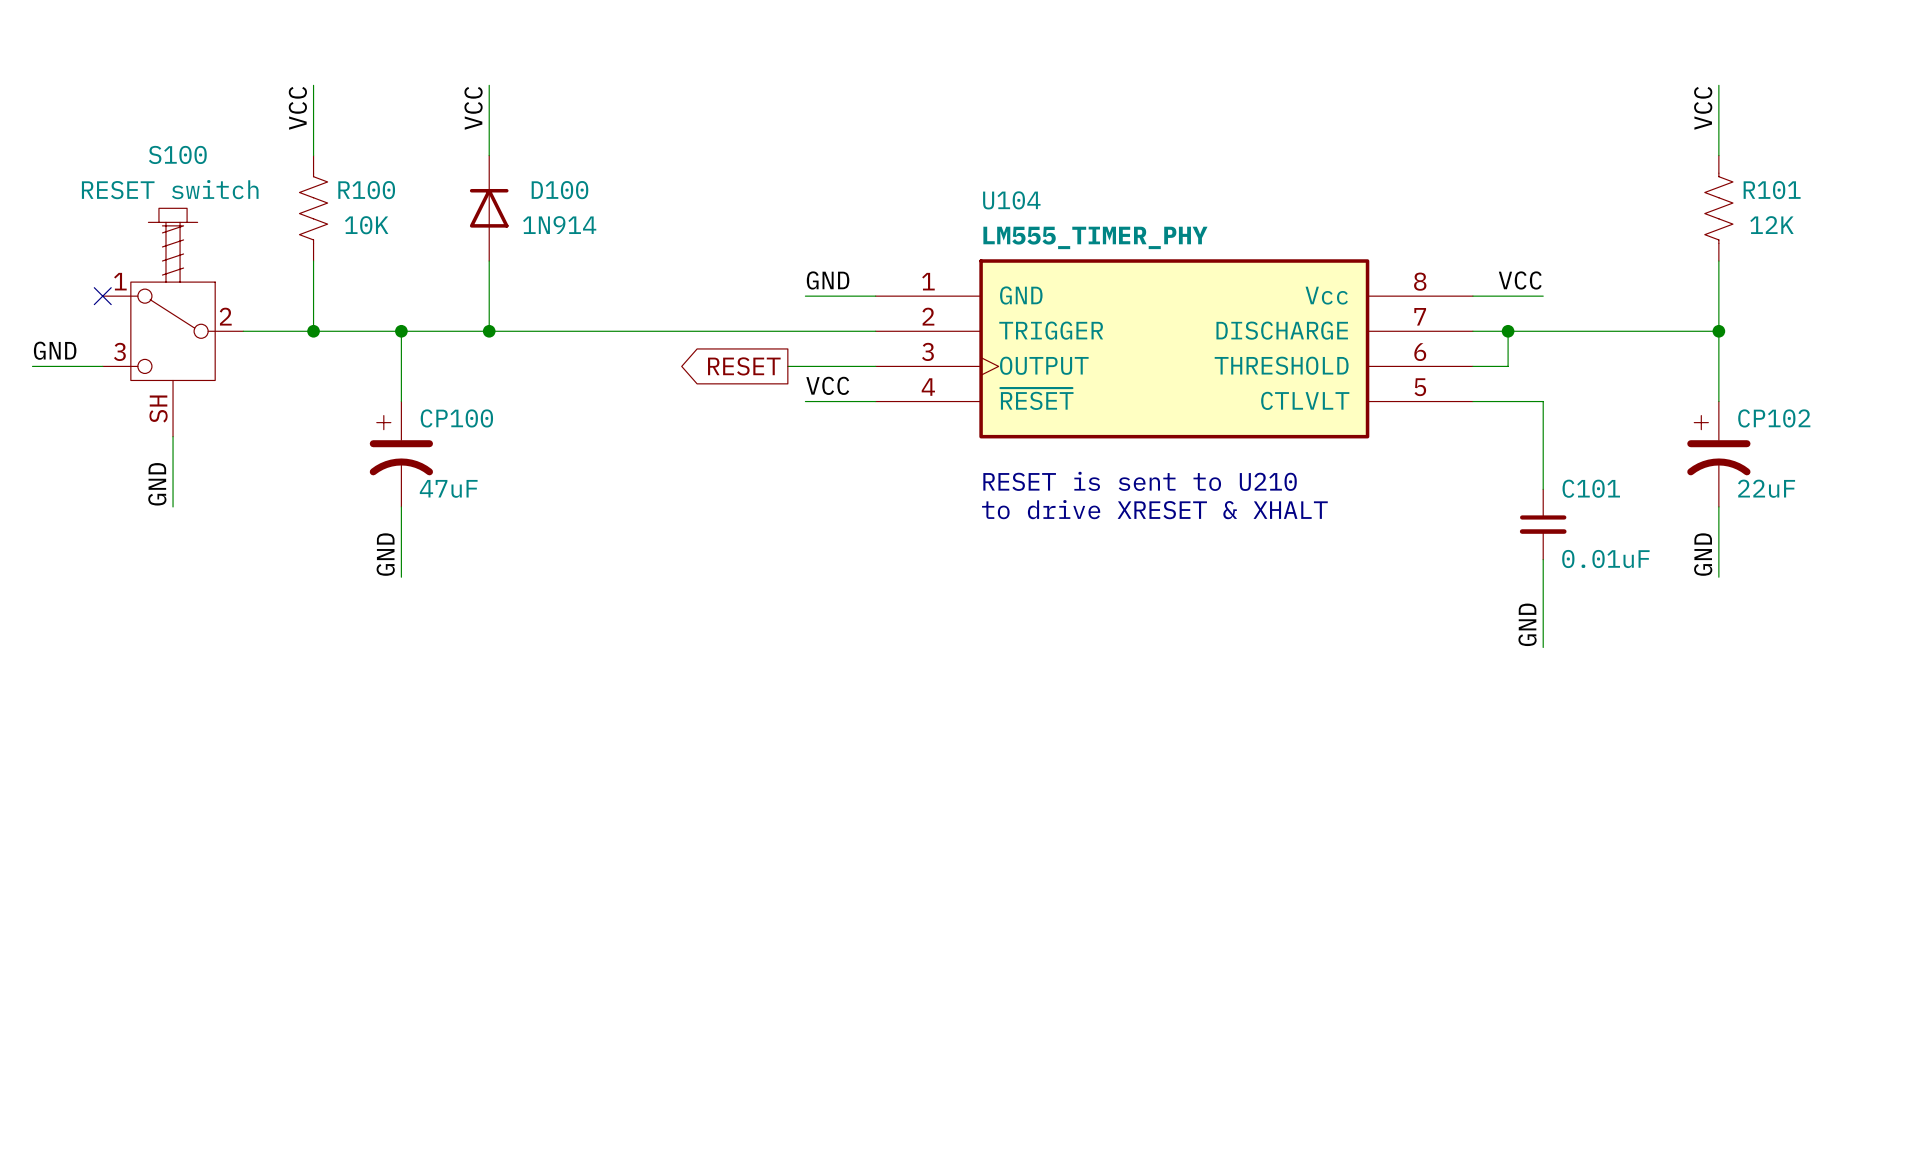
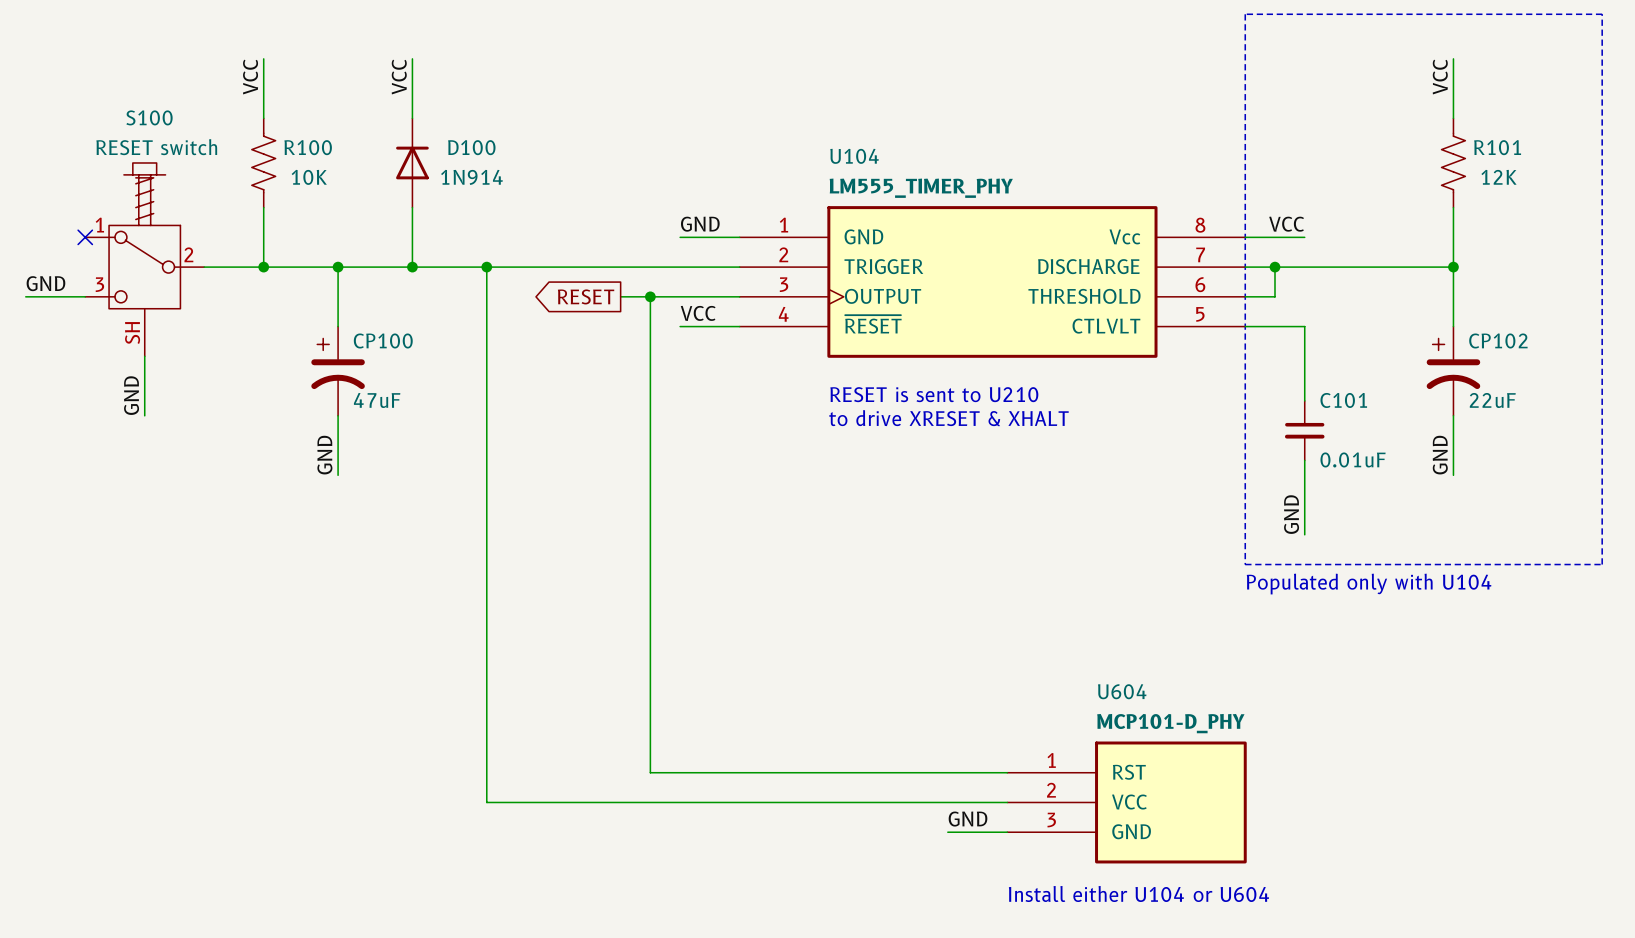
line: none -> (1245, 14) (1602, 14) (1602, 564) (1245, 564) (1245, 14)
wire: none -> (486, 267) (486, 802) (1007, 802)
junction: none -> (486, 267)
wire: none -> (620, 296) (665, 296)
global label position: RESET (744, 366) -> RESET (586, 296)
wire: none -> (650, 296) (650, 772) (1007, 772)
junction: none -> (650, 296)
text: none -> Populated only with U104 (1369, 584)
U604: none -> MCP101-D_PHY (1127, 802)
label: none -> GND (968, 819)
wire: none -> (947, 832) (1007, 832)
text: none -> Install either U104 or U604 (1138, 893)

